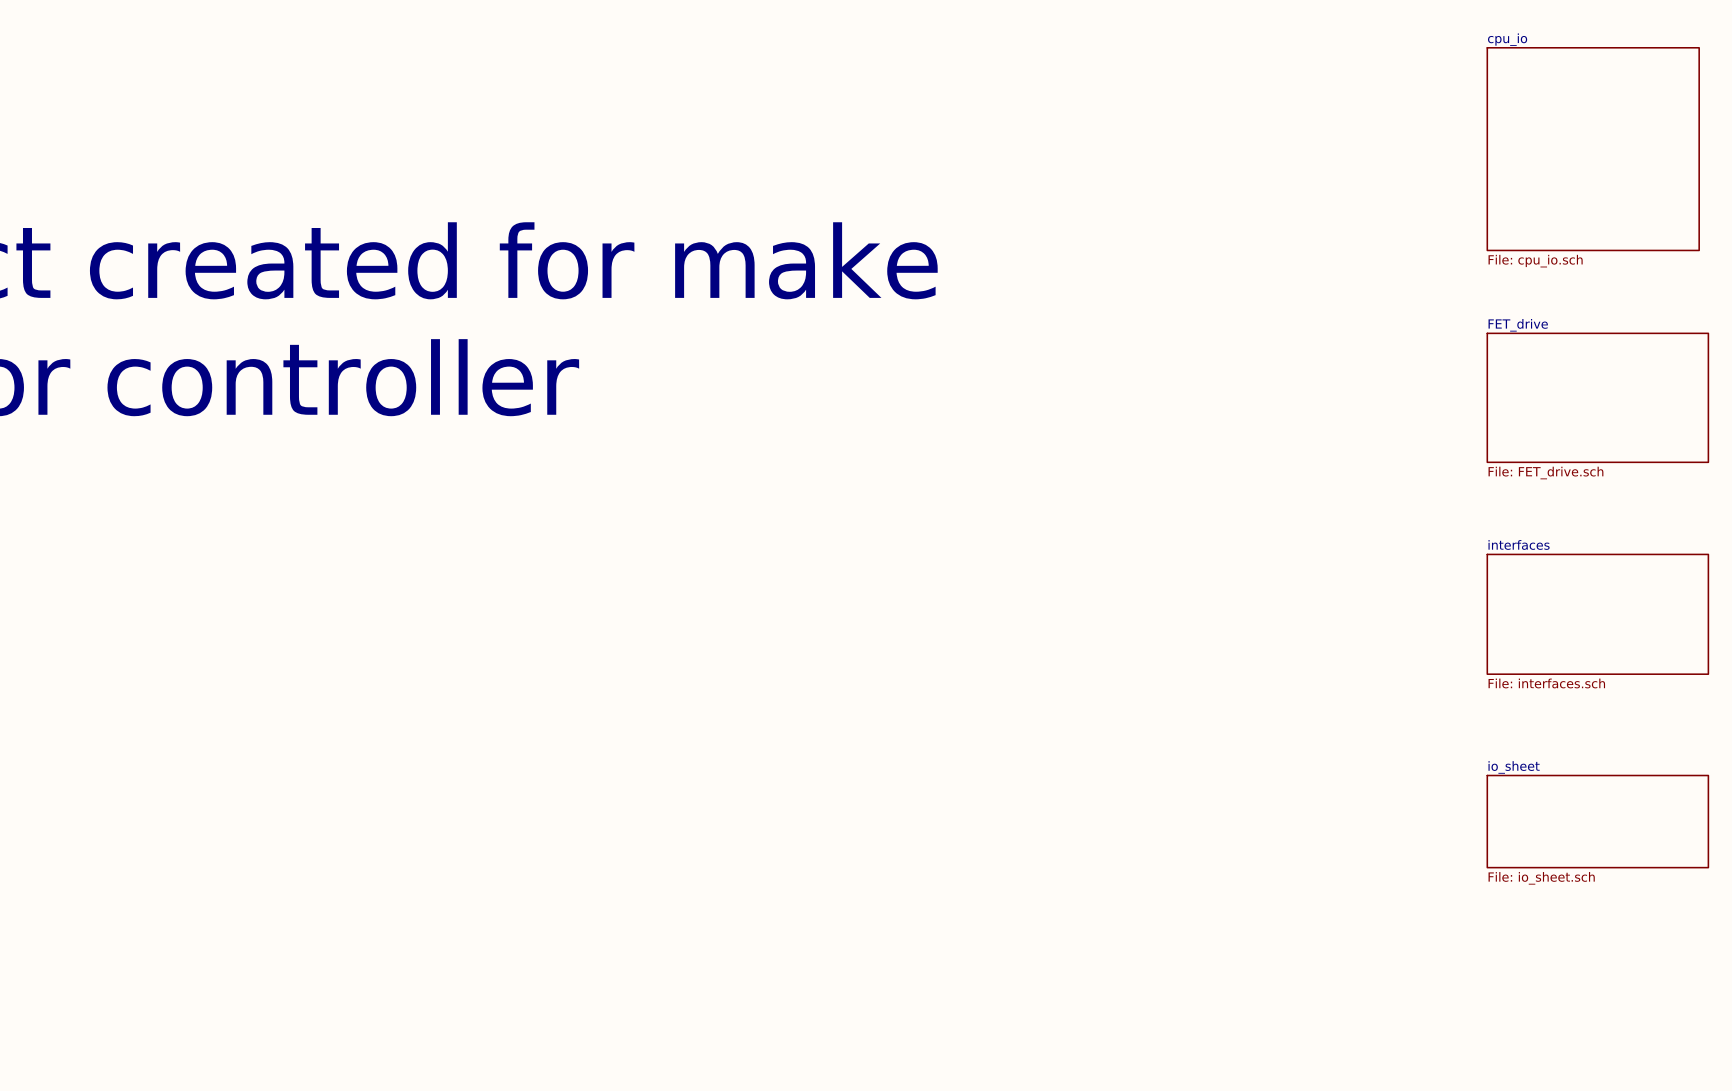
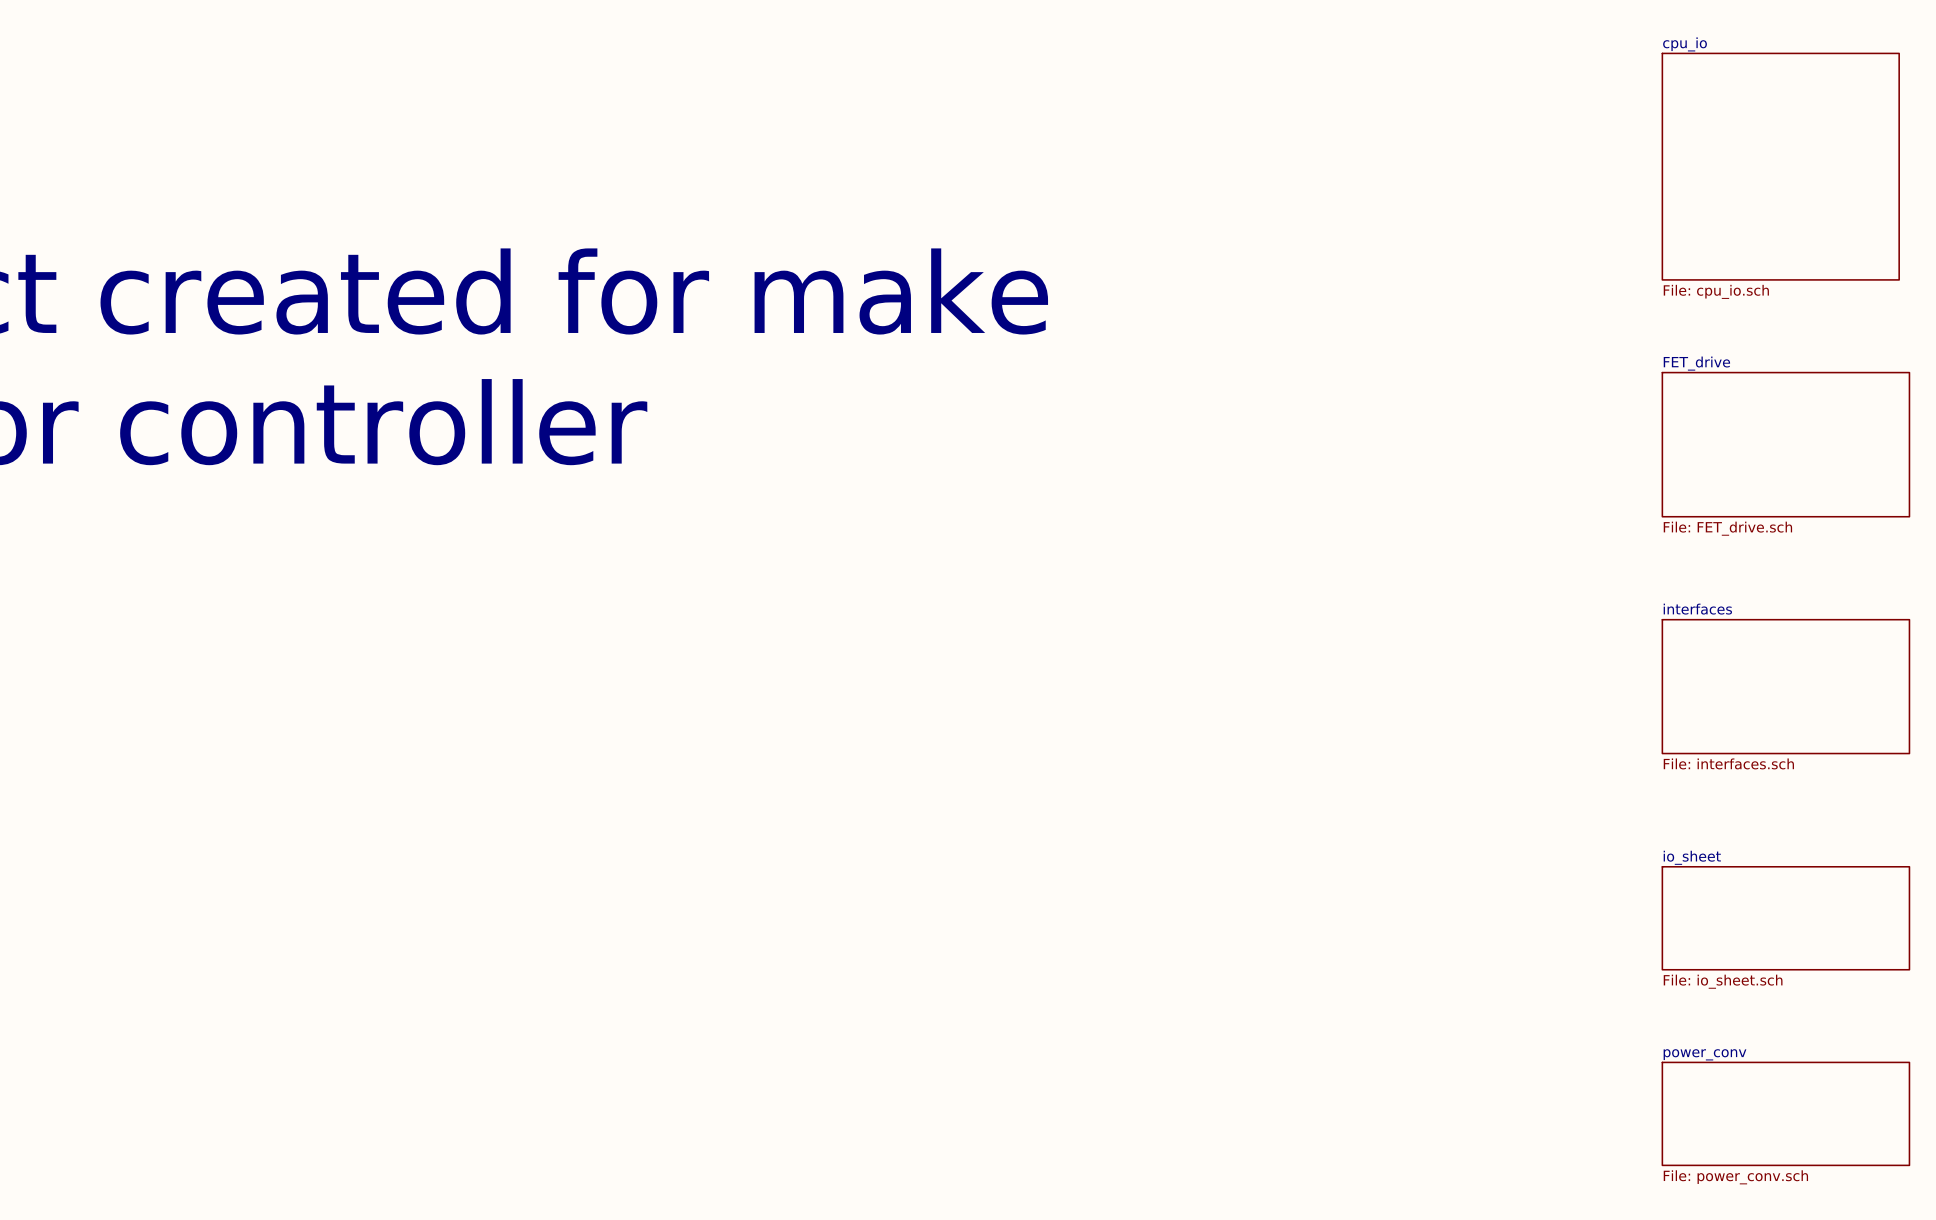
sheet power_conv: none -> File: power_conv.sch (1785, 1113)

